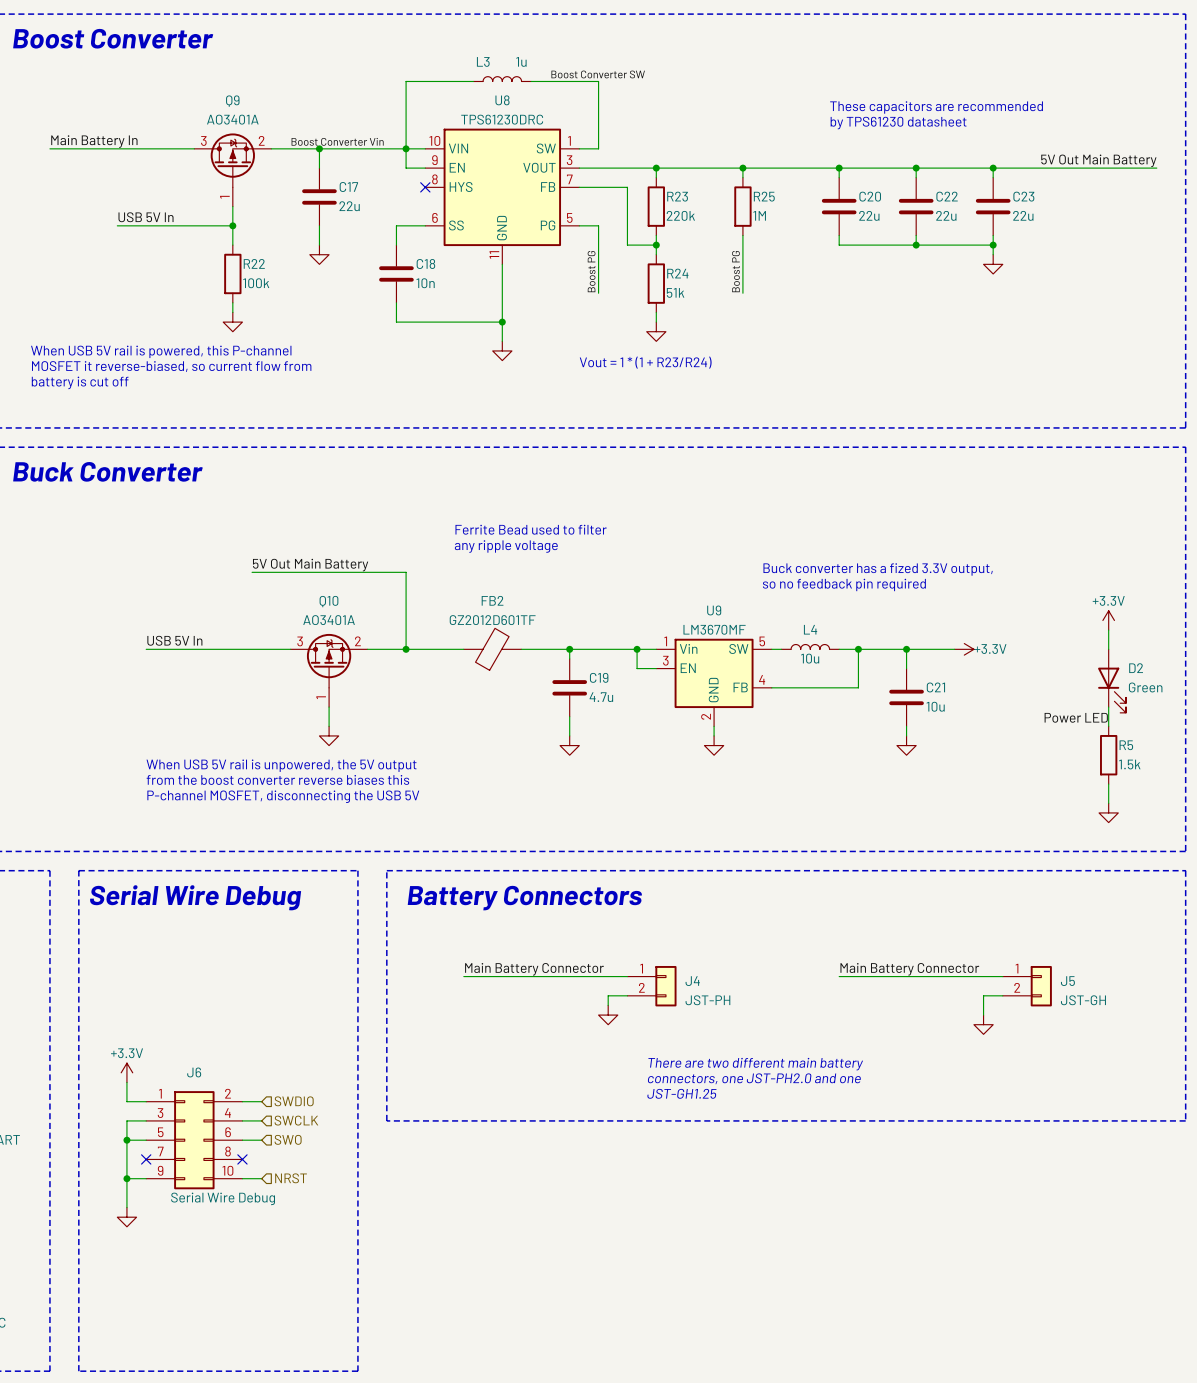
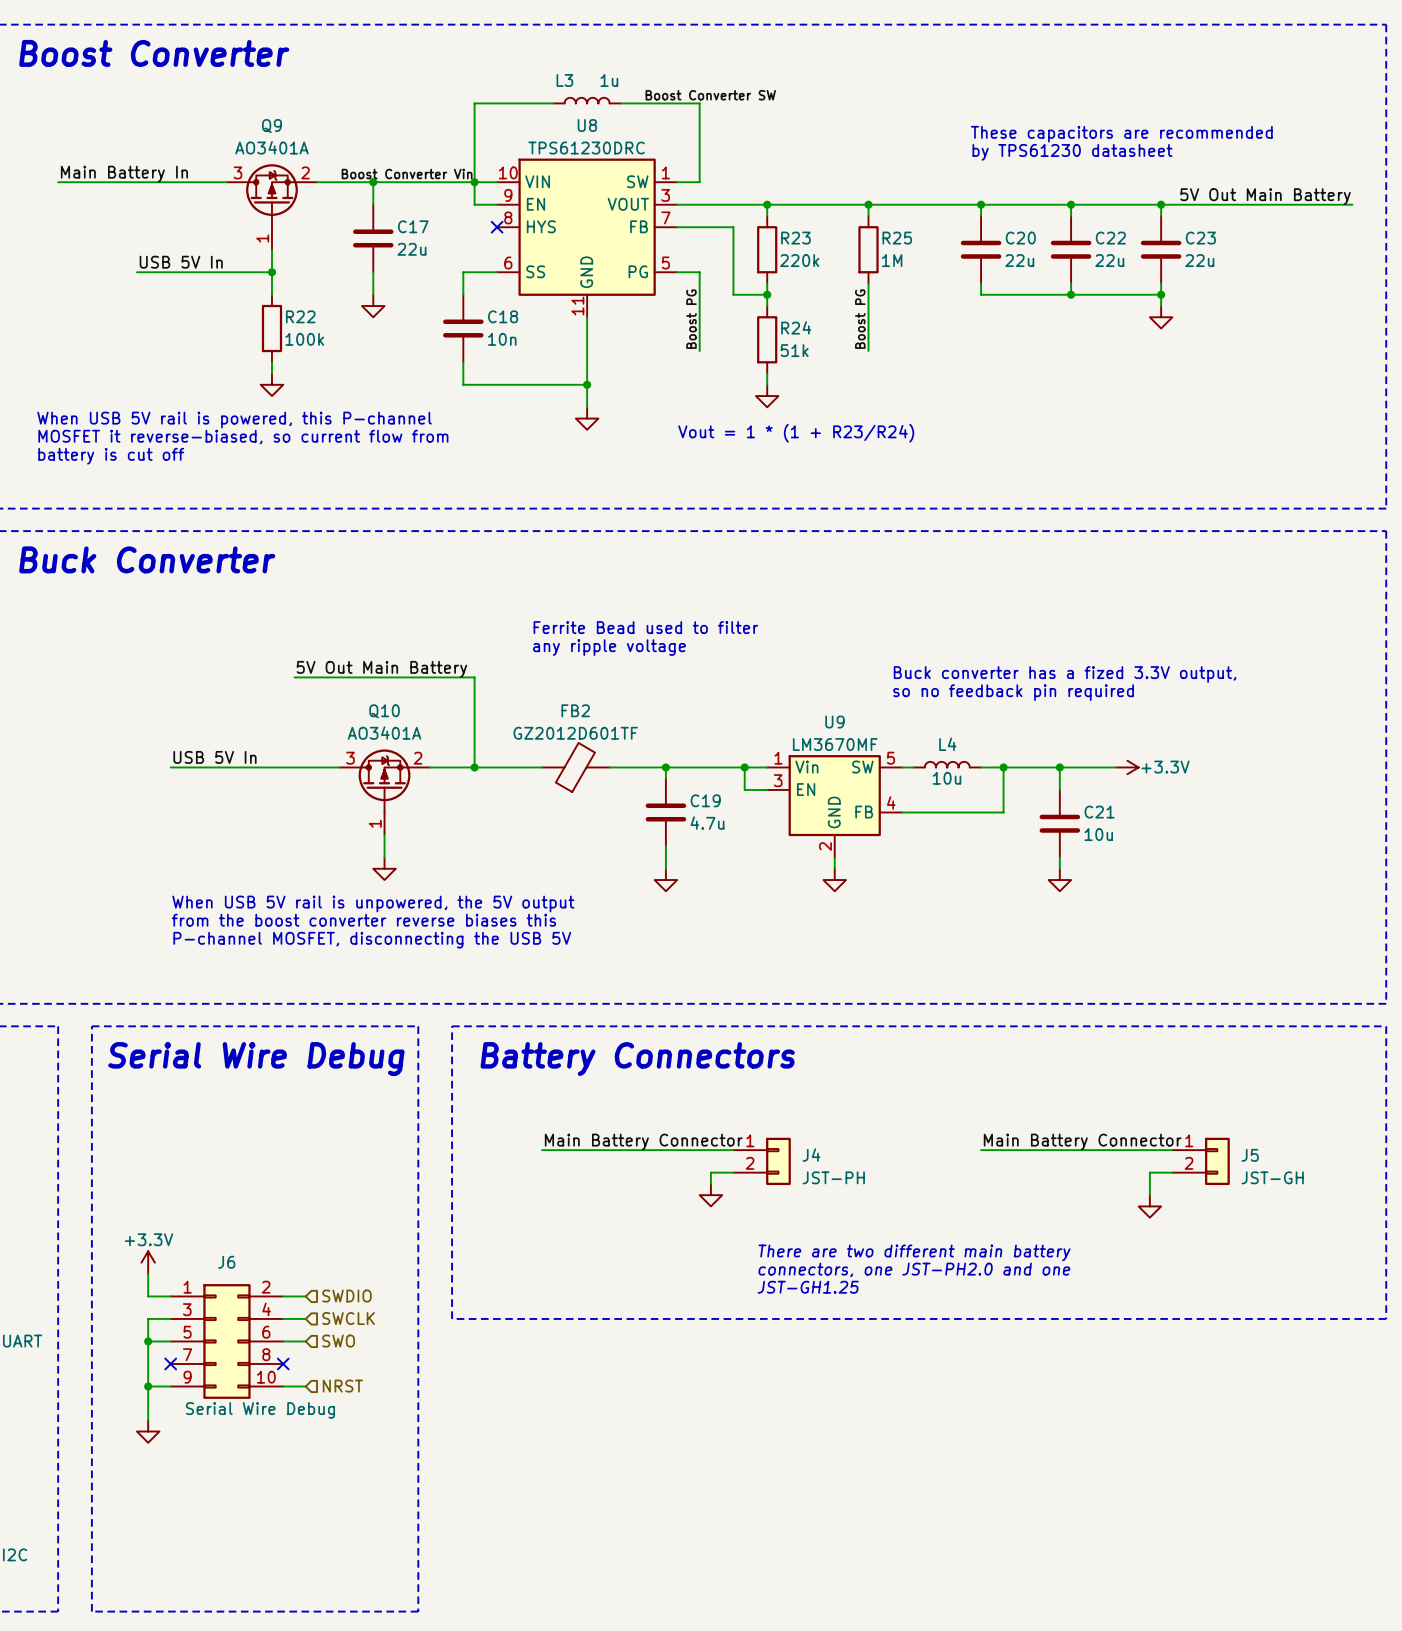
power symbol: +3.3V (1108, 620) -> none
wire: (1108, 630) (1108, 649) -> none
D2: Green (1112, 681) -> none
wire: (1108, 707) (1108, 726) -> none
label: Power LED (1076, 717) -> none
R5: 1.5k (1108, 755) -> none
wire: (1108, 784) (1108, 803) -> none
power symbol: (1108, 812) -> none

